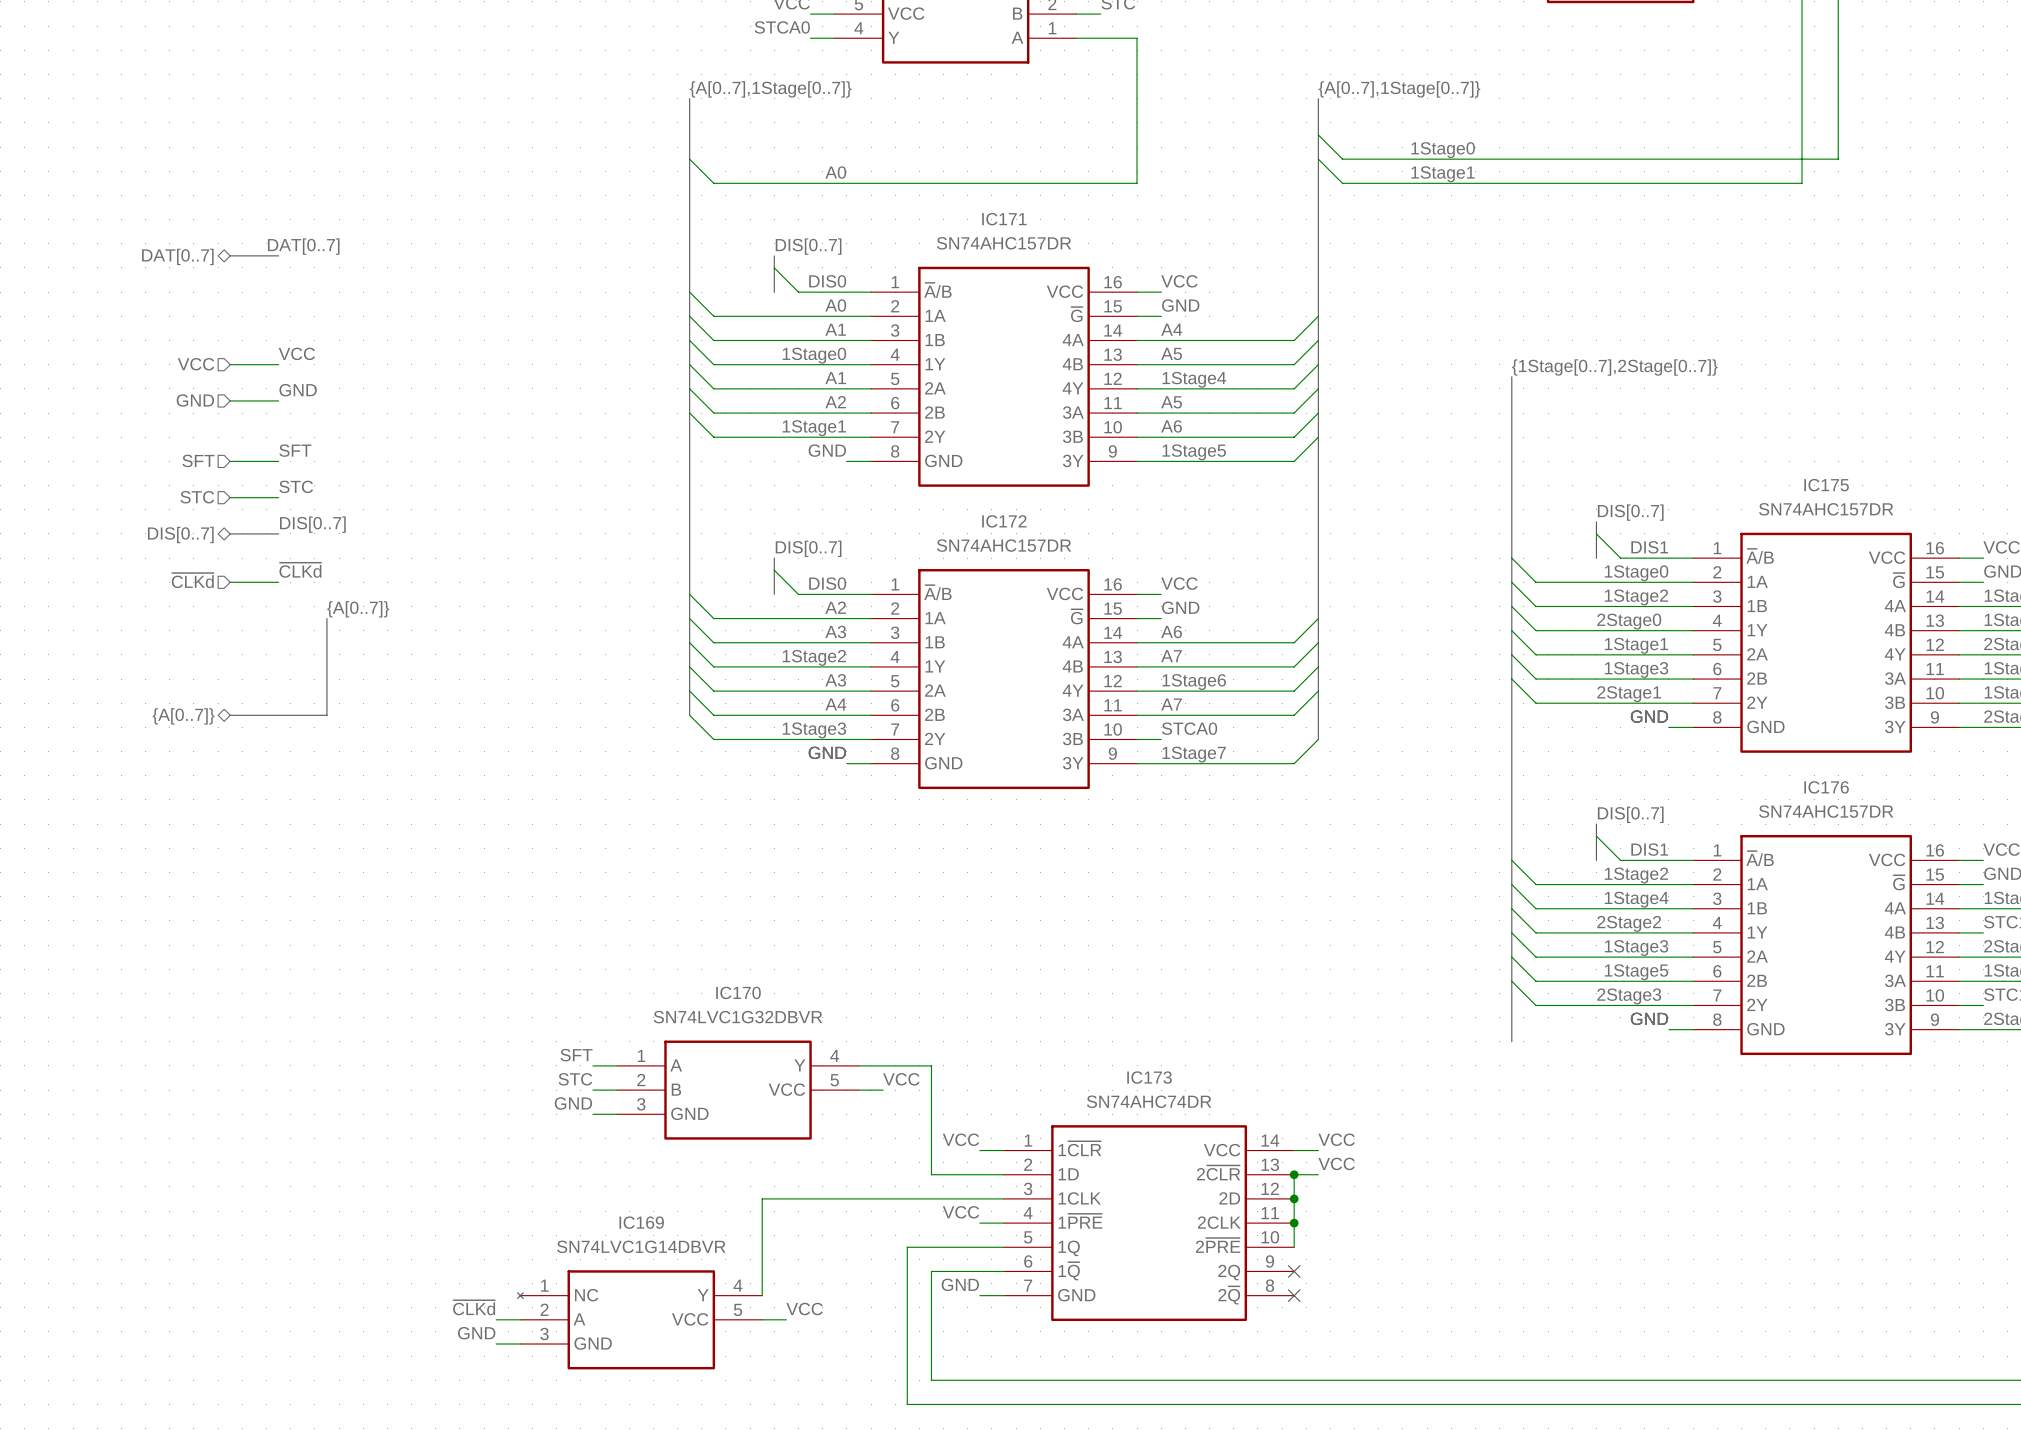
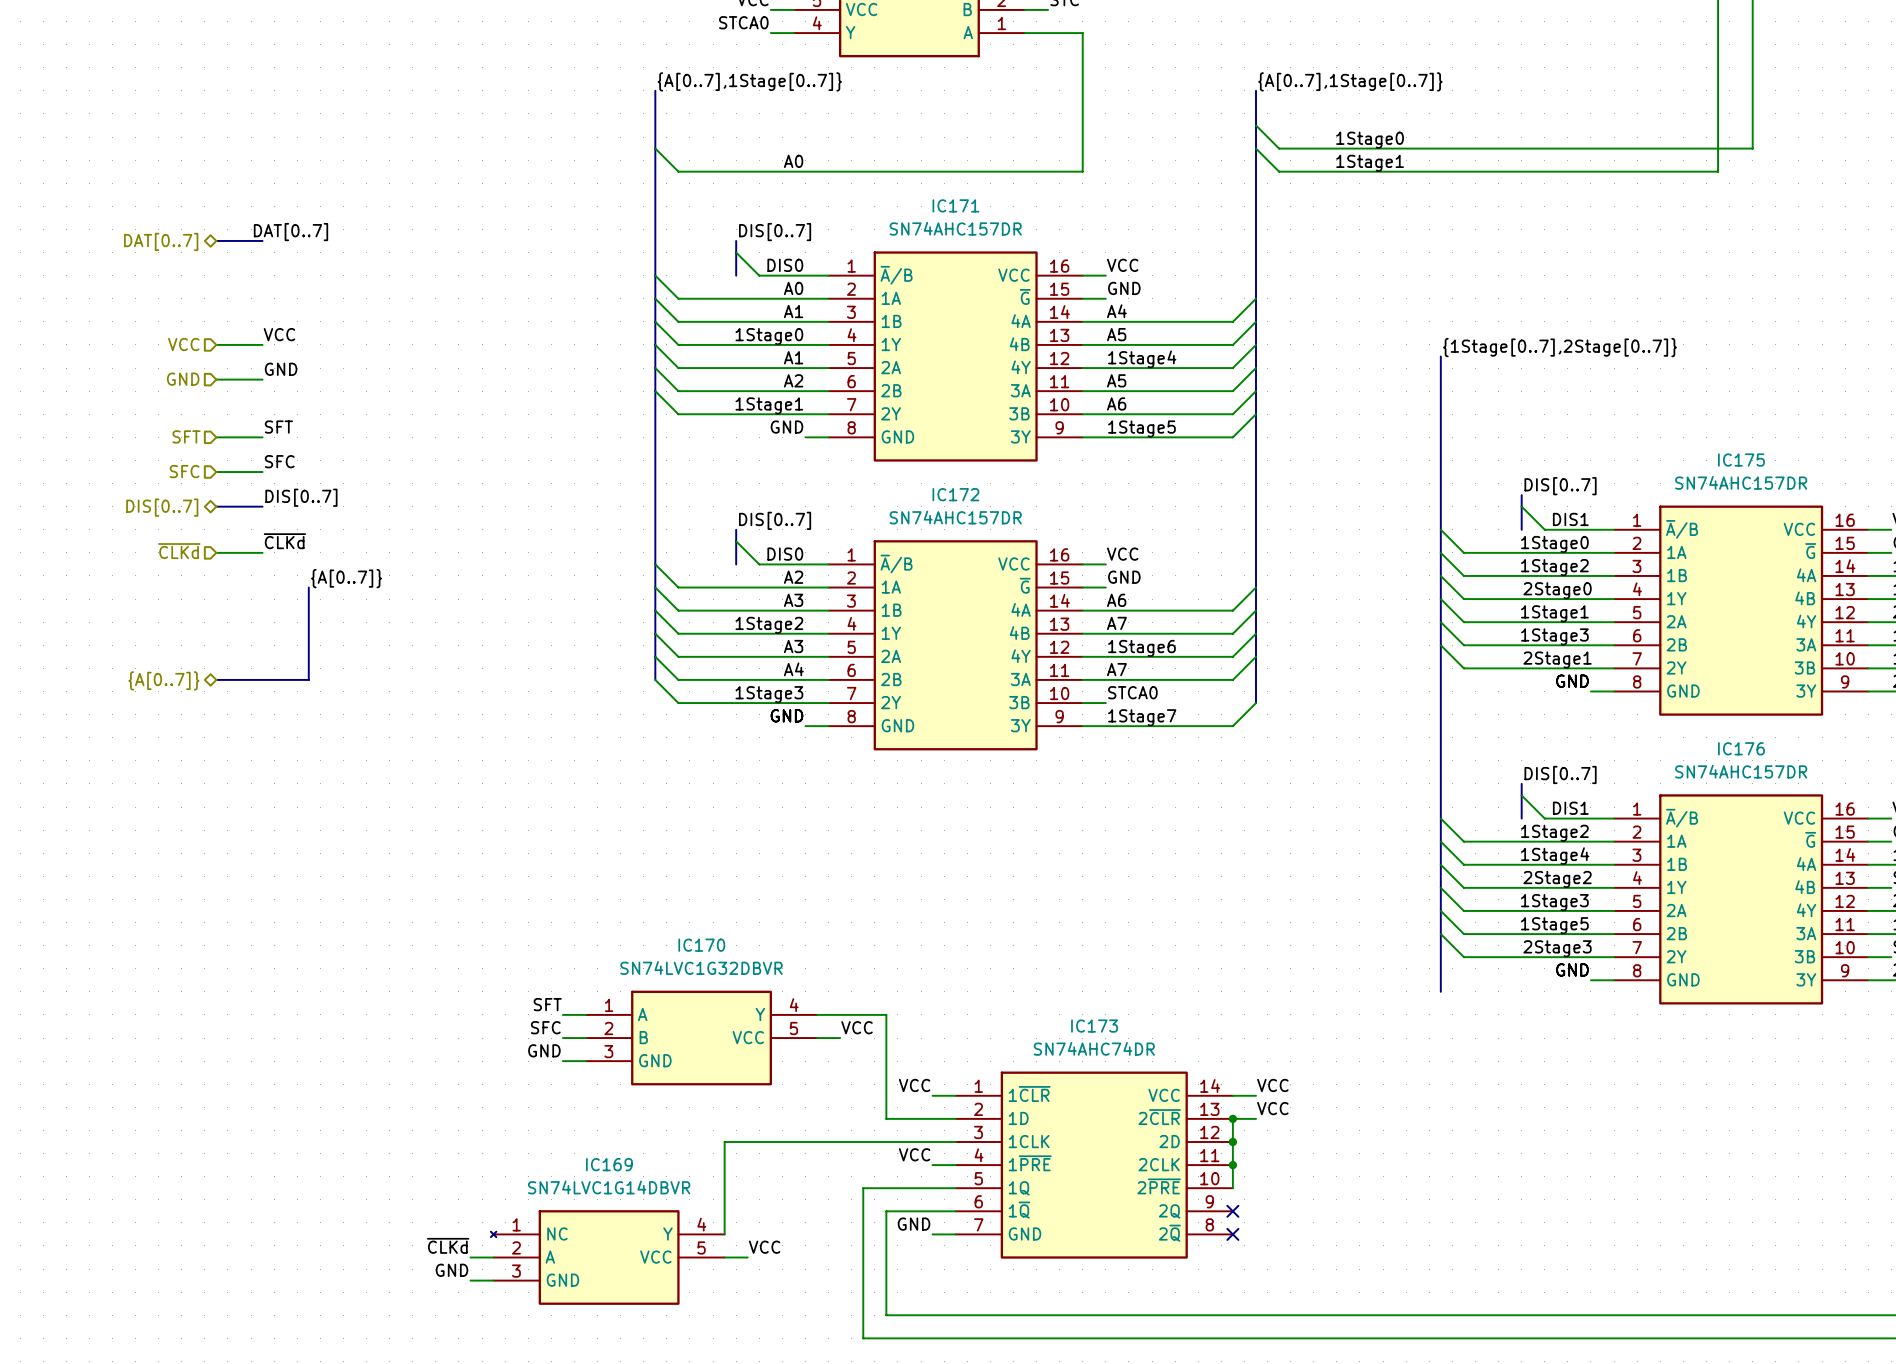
label: STC (296, 486) -> SFC (279, 461)
hierarchical label: STC (197, 497) -> SFC (184, 471)
label: STC (575, 1079) -> SFC (545, 1027)

